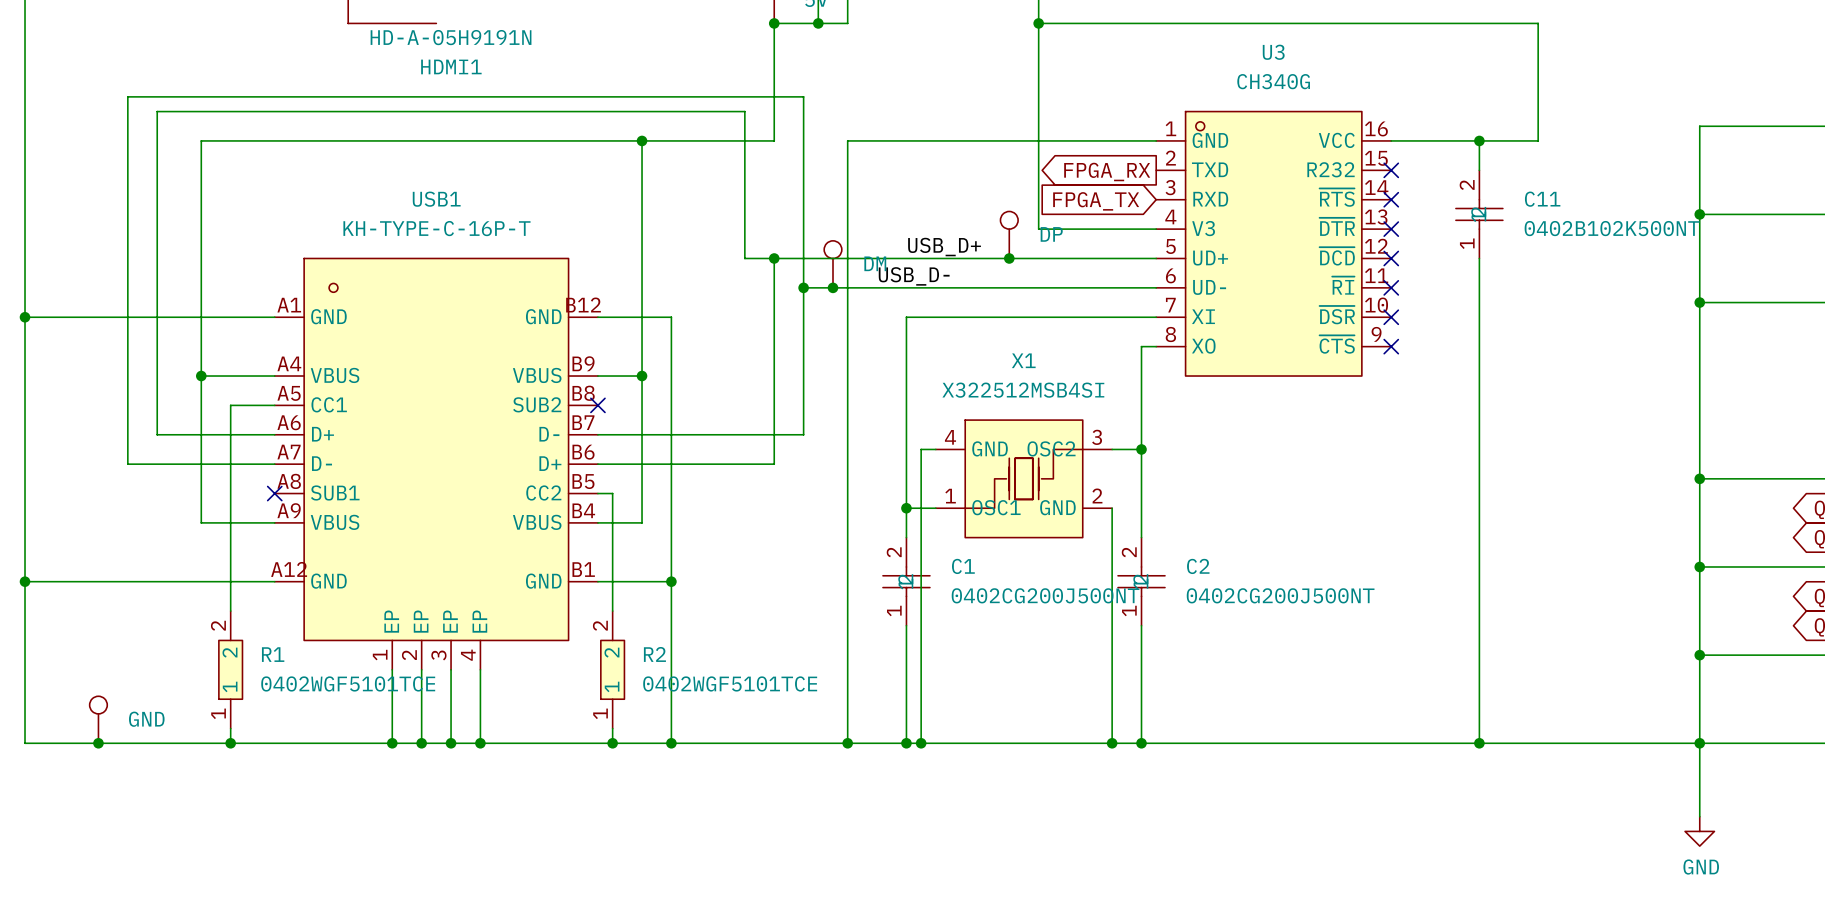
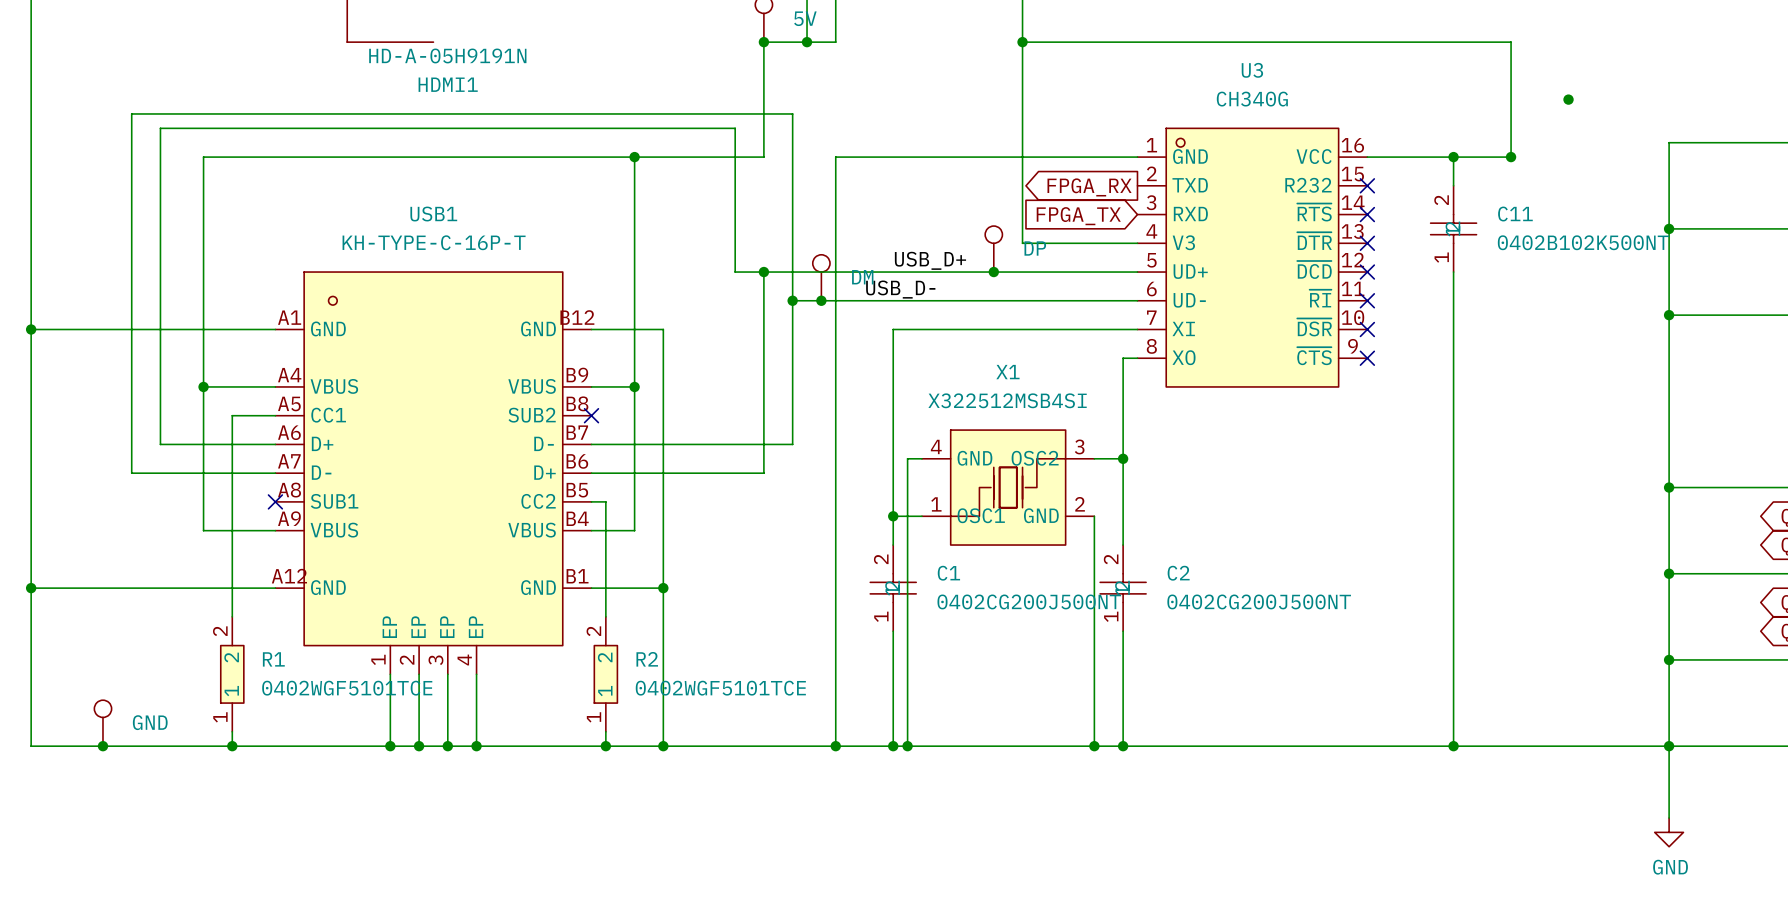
junction: none -> (1568, 99)
junction: none -> (1511, 157)

